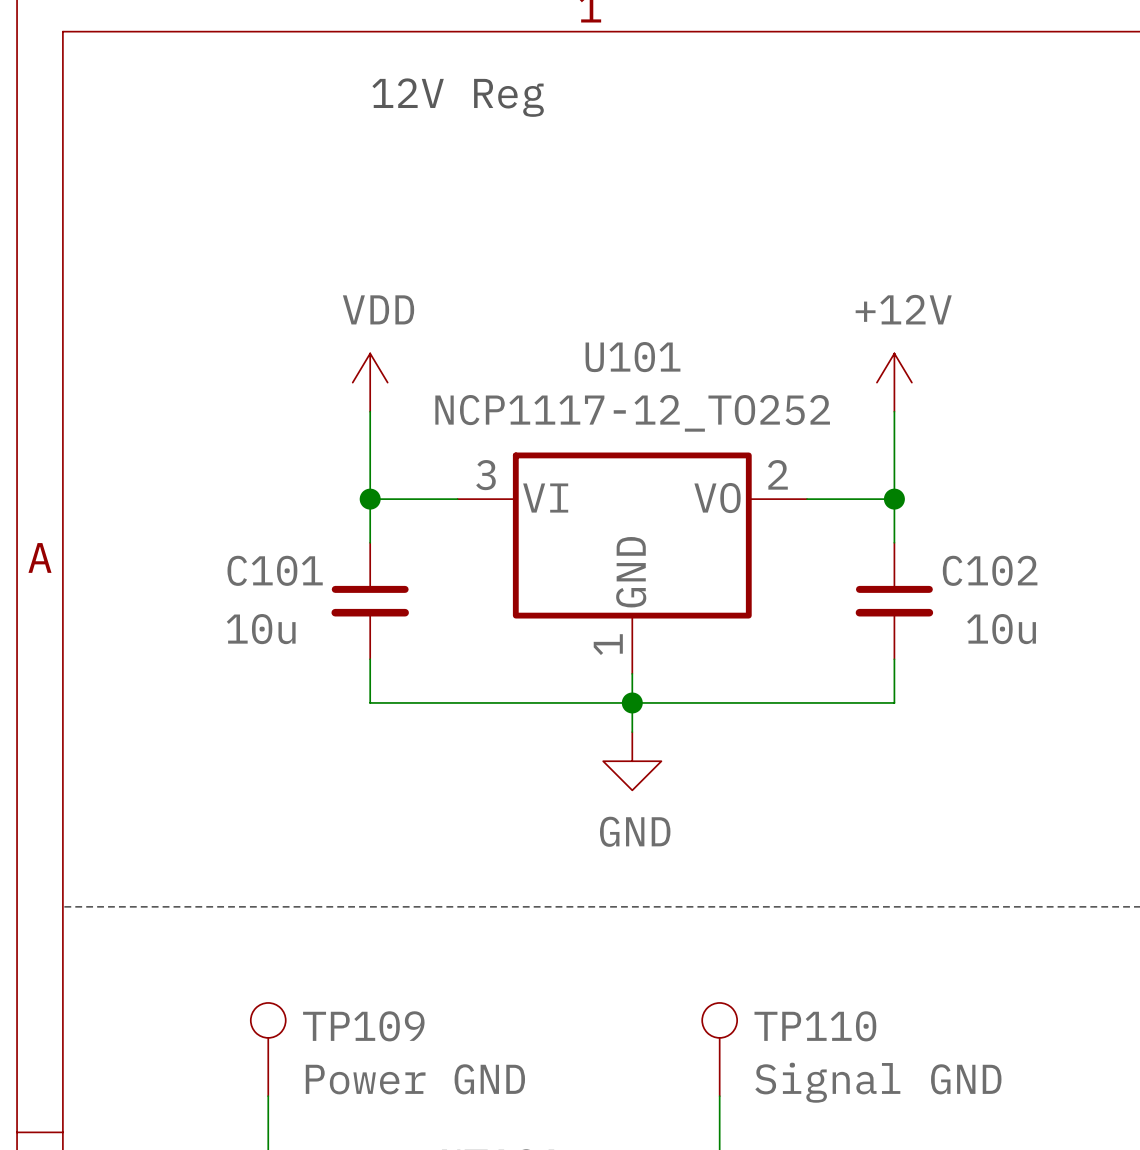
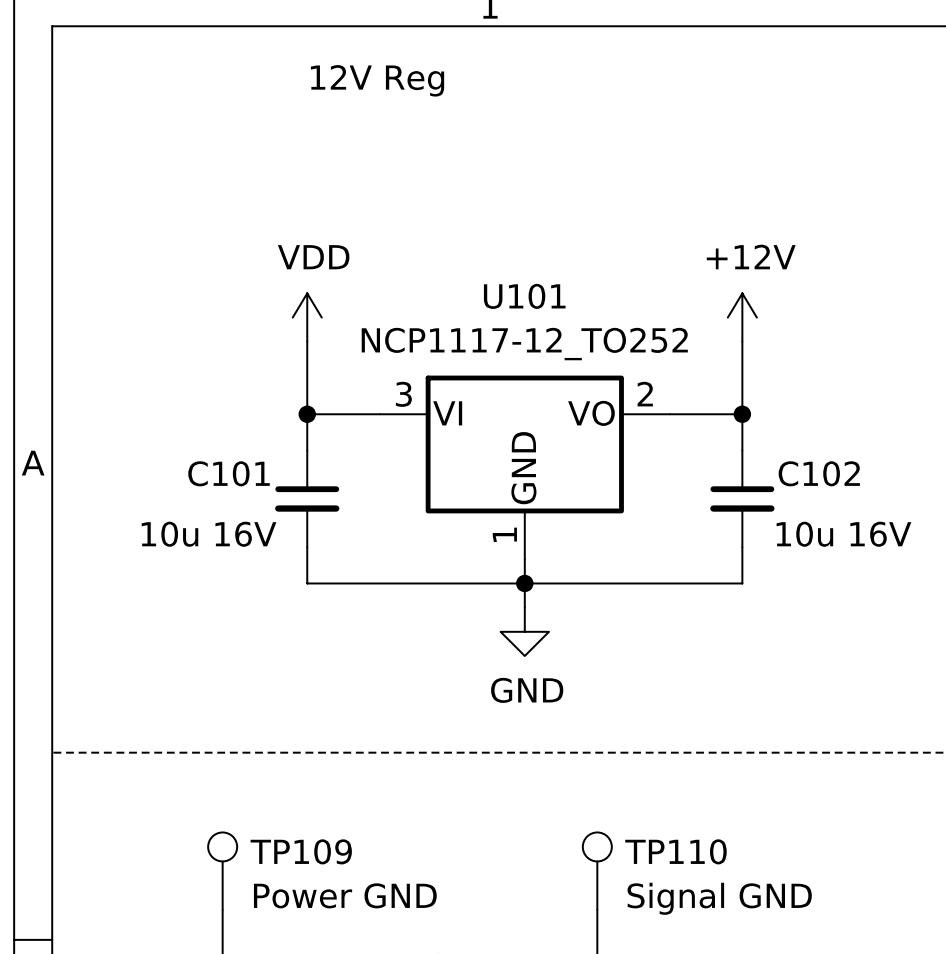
C101 value: 10u (261, 629) -> 10u 16V (209, 534)
C102 value: 10u (1001, 629) -> 10u 16V (843, 534)

